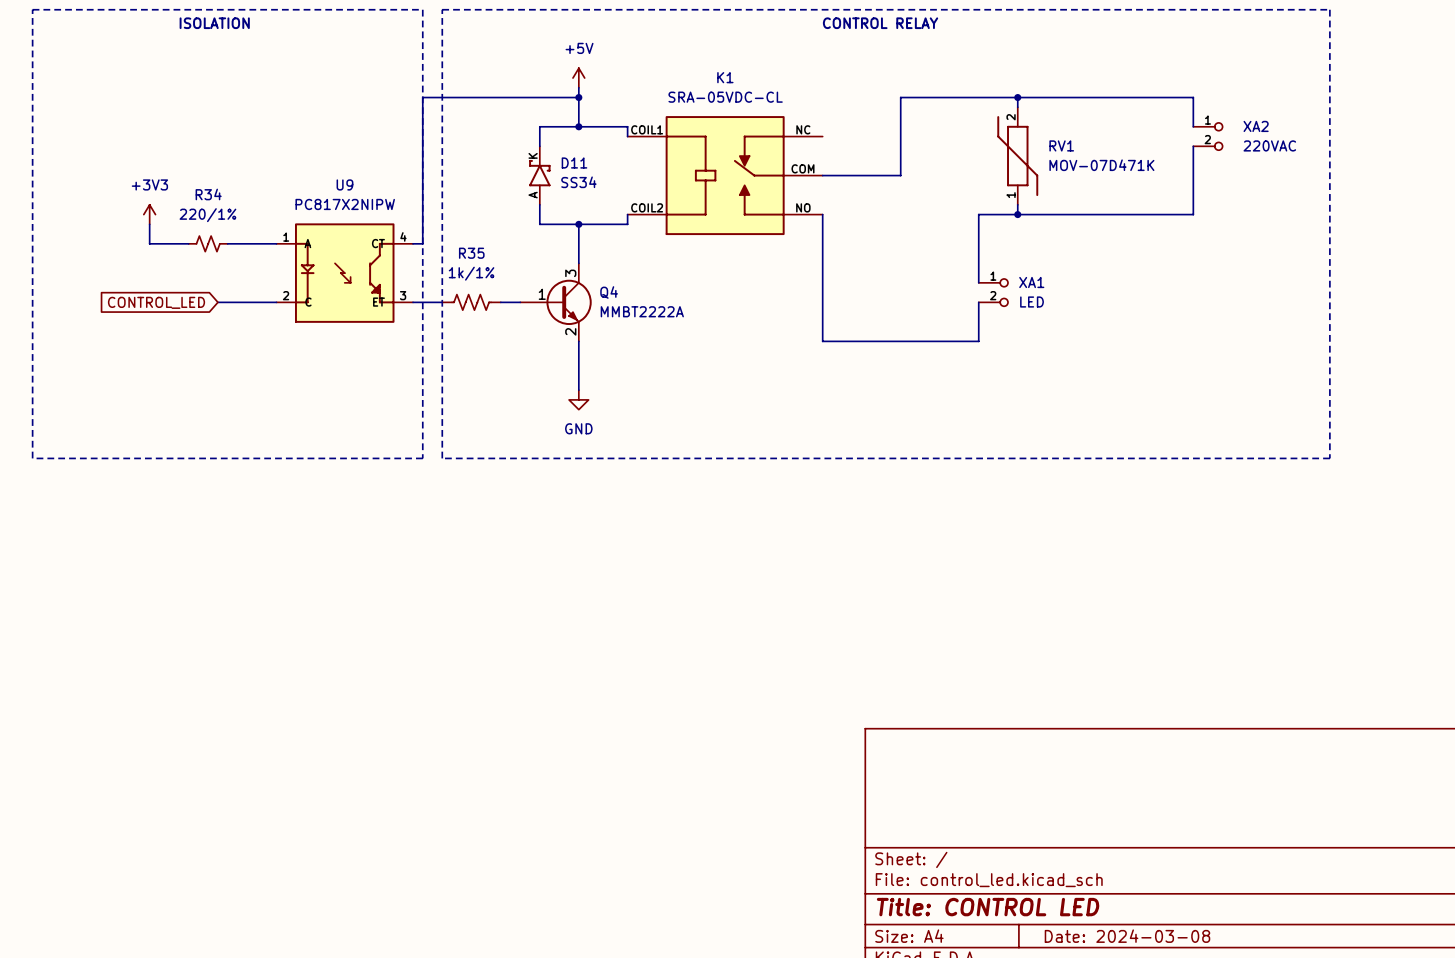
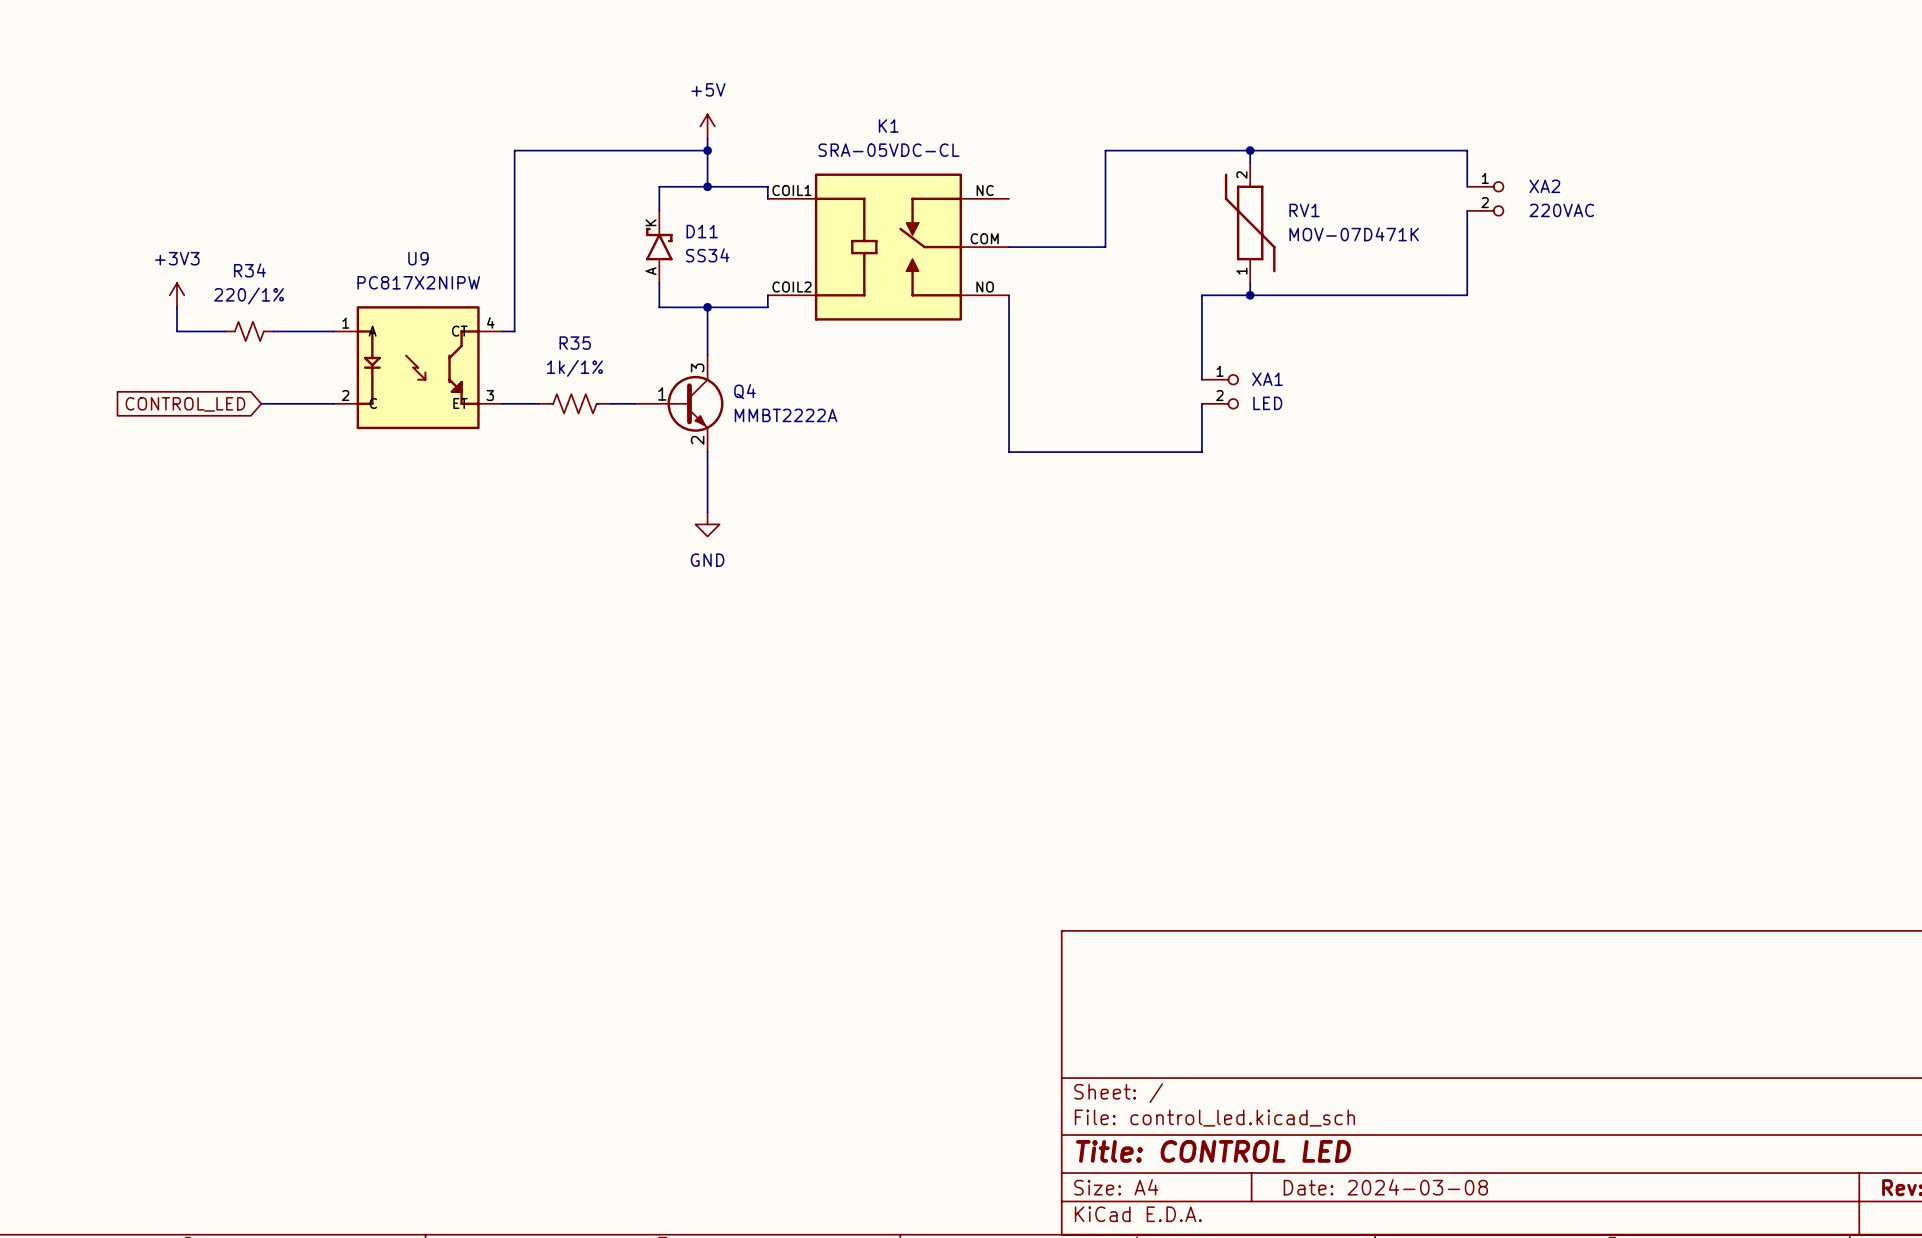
line: (32, 9) (422, 9) (422, 458) (32, 458) (32, 9) -> none
line: (442, 9) (1329, 9) (1329, 458) (442, 458) (442, 9) -> none
text: ISOLATION (214, 23) -> none
text: CONTROL RELAY (880, 23) -> none

